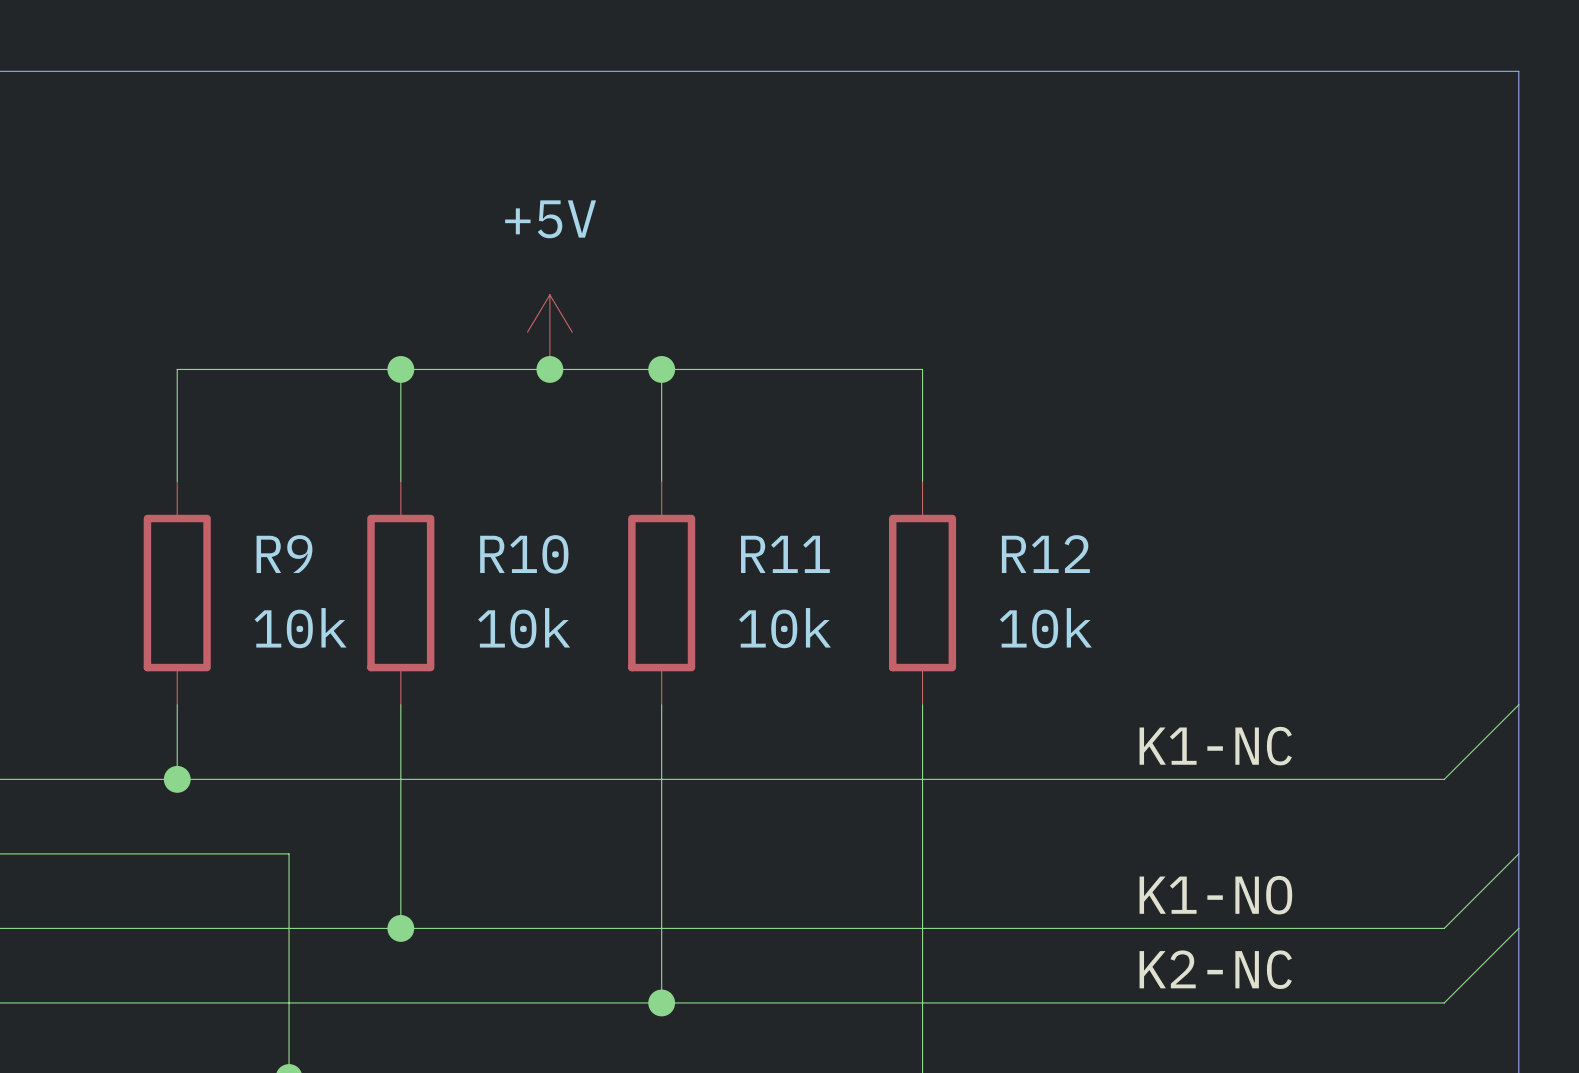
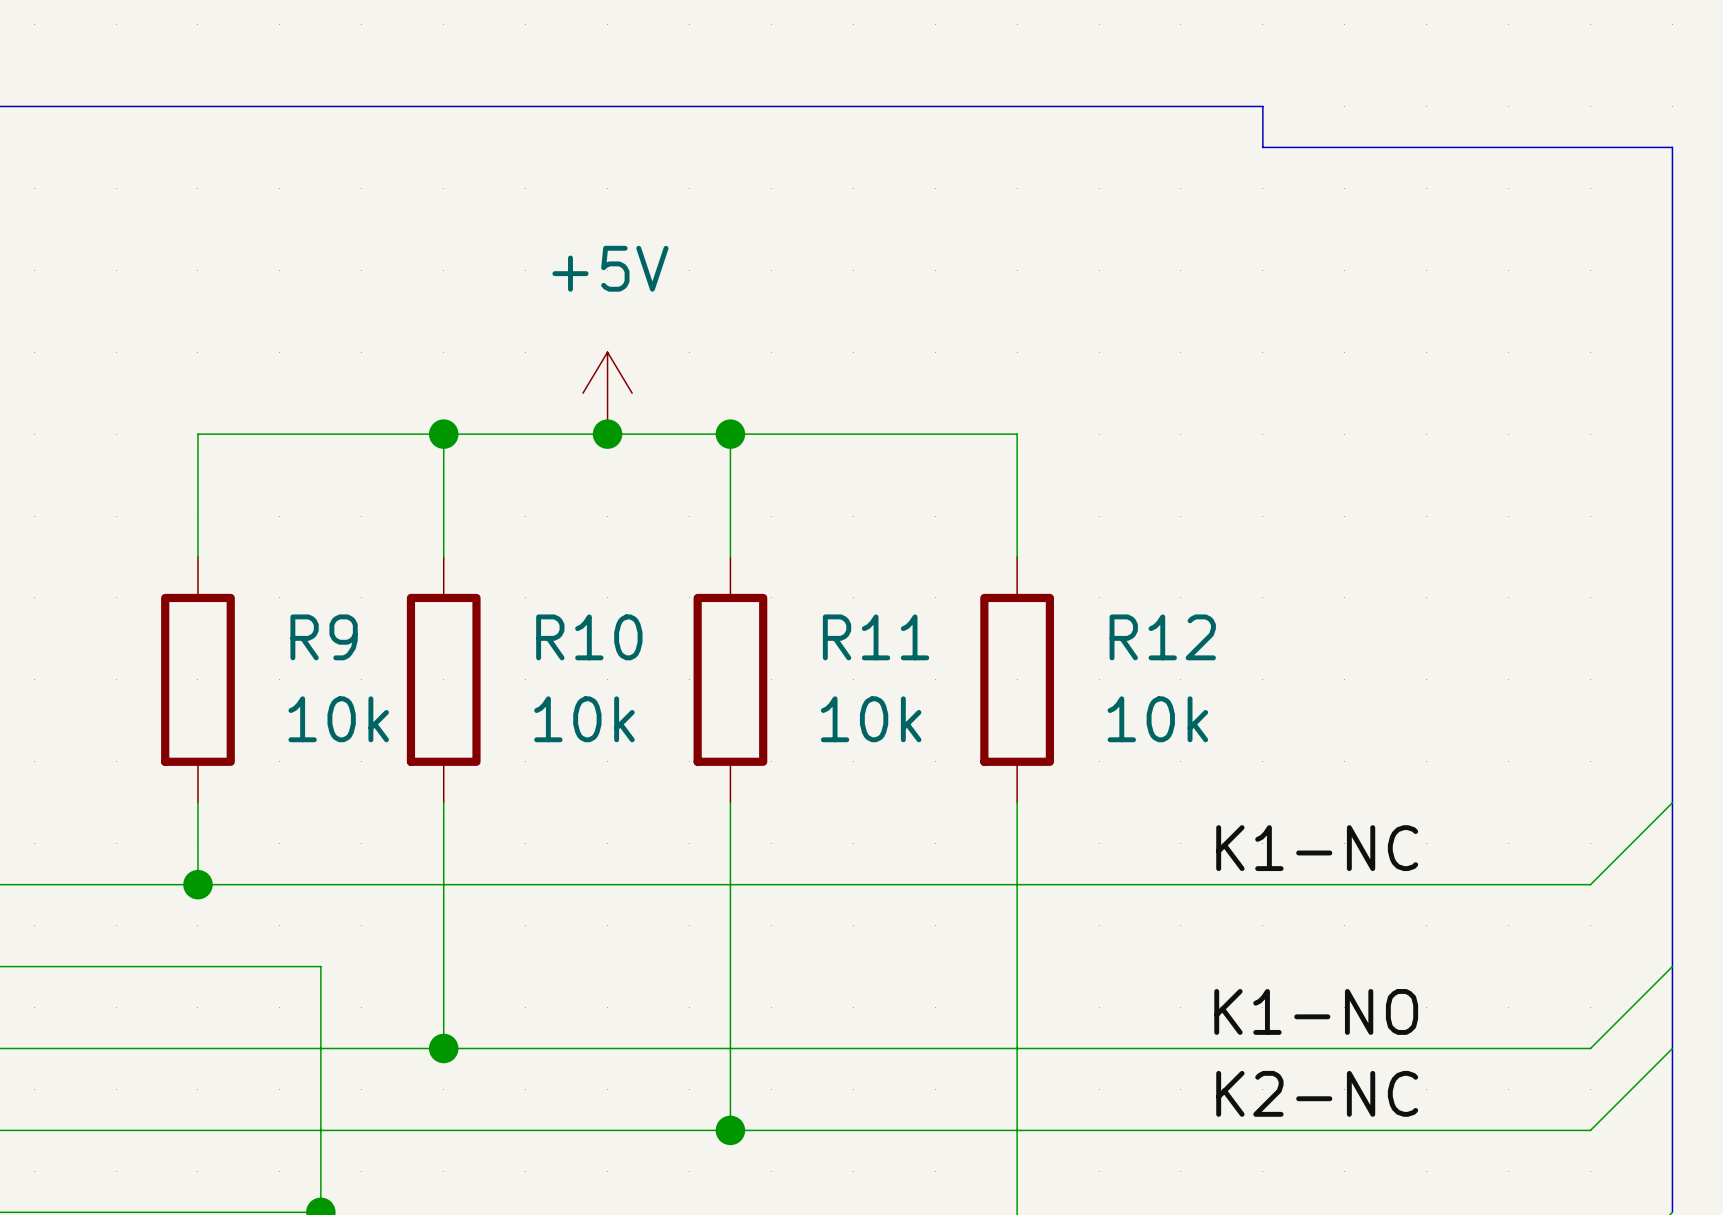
bus: (1146, 71) (1518, 71) (1518, 108) -> (1262, 106) (1262, 147) (1672, 147)

